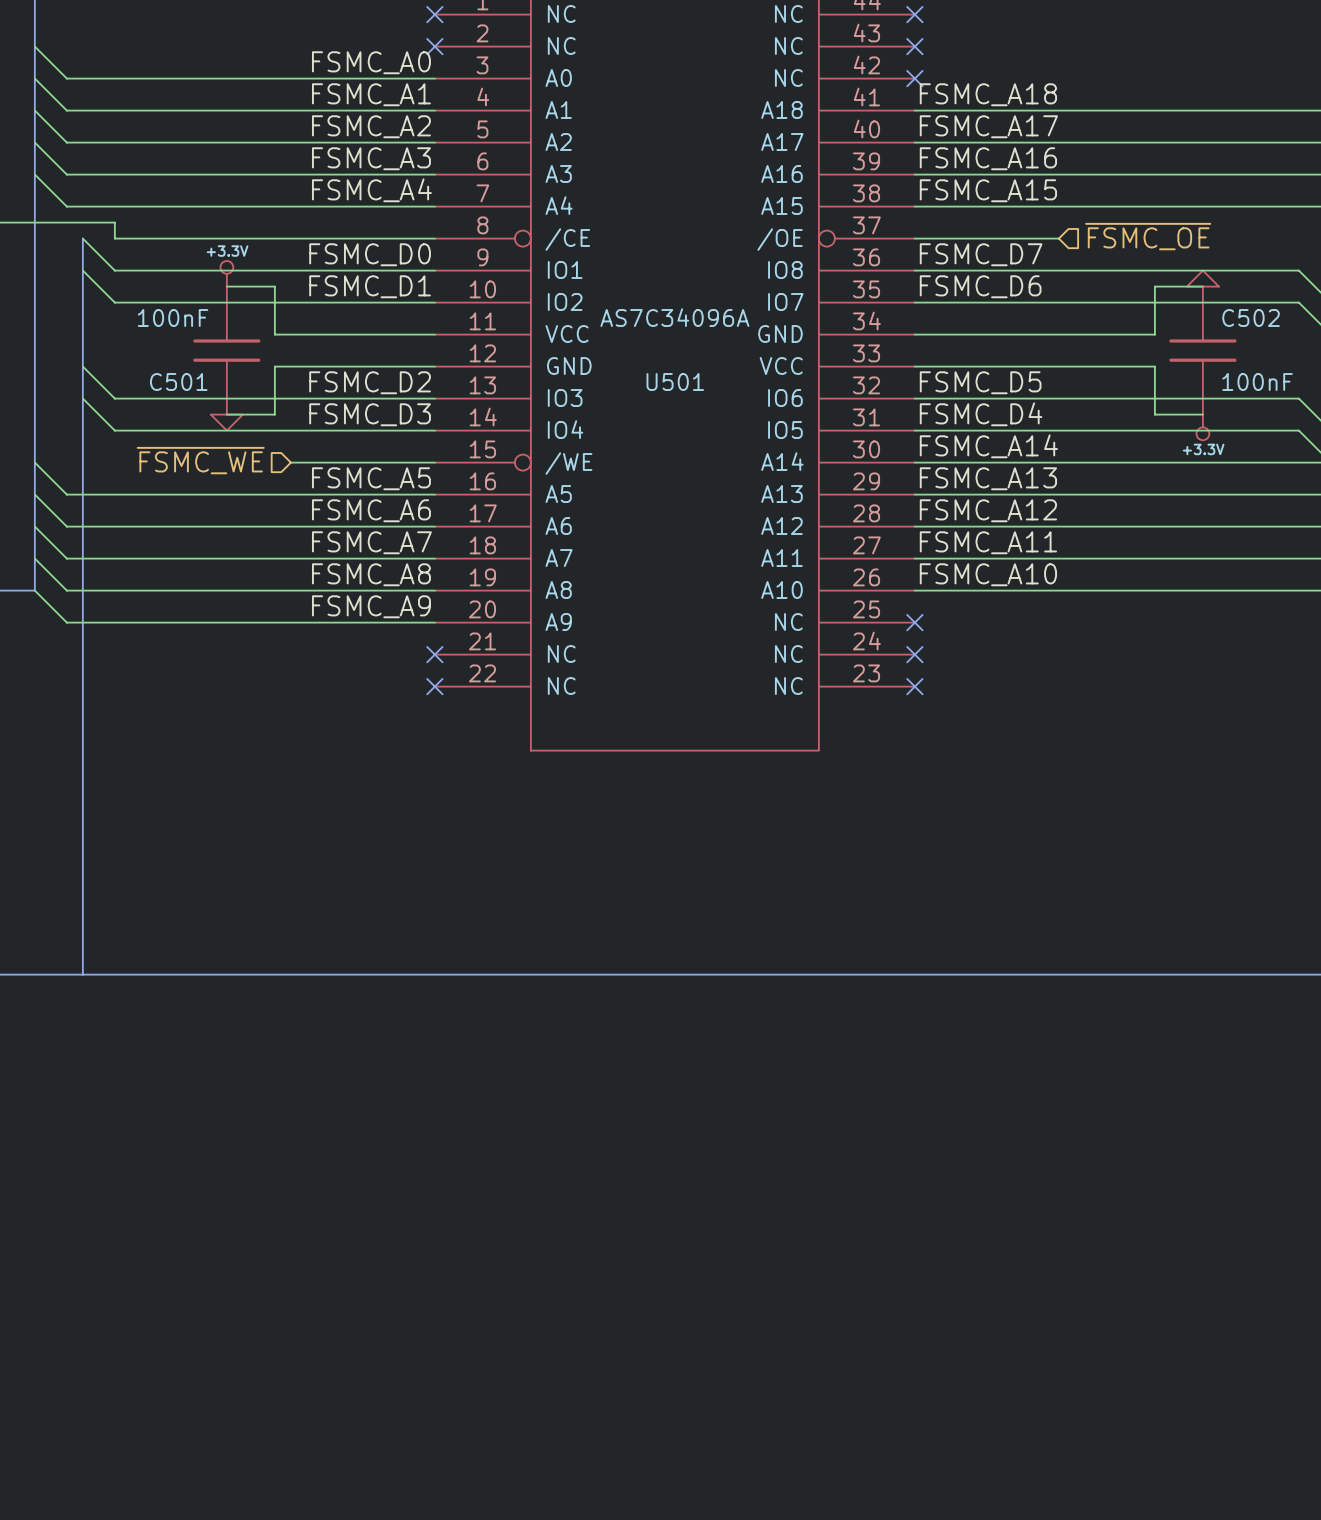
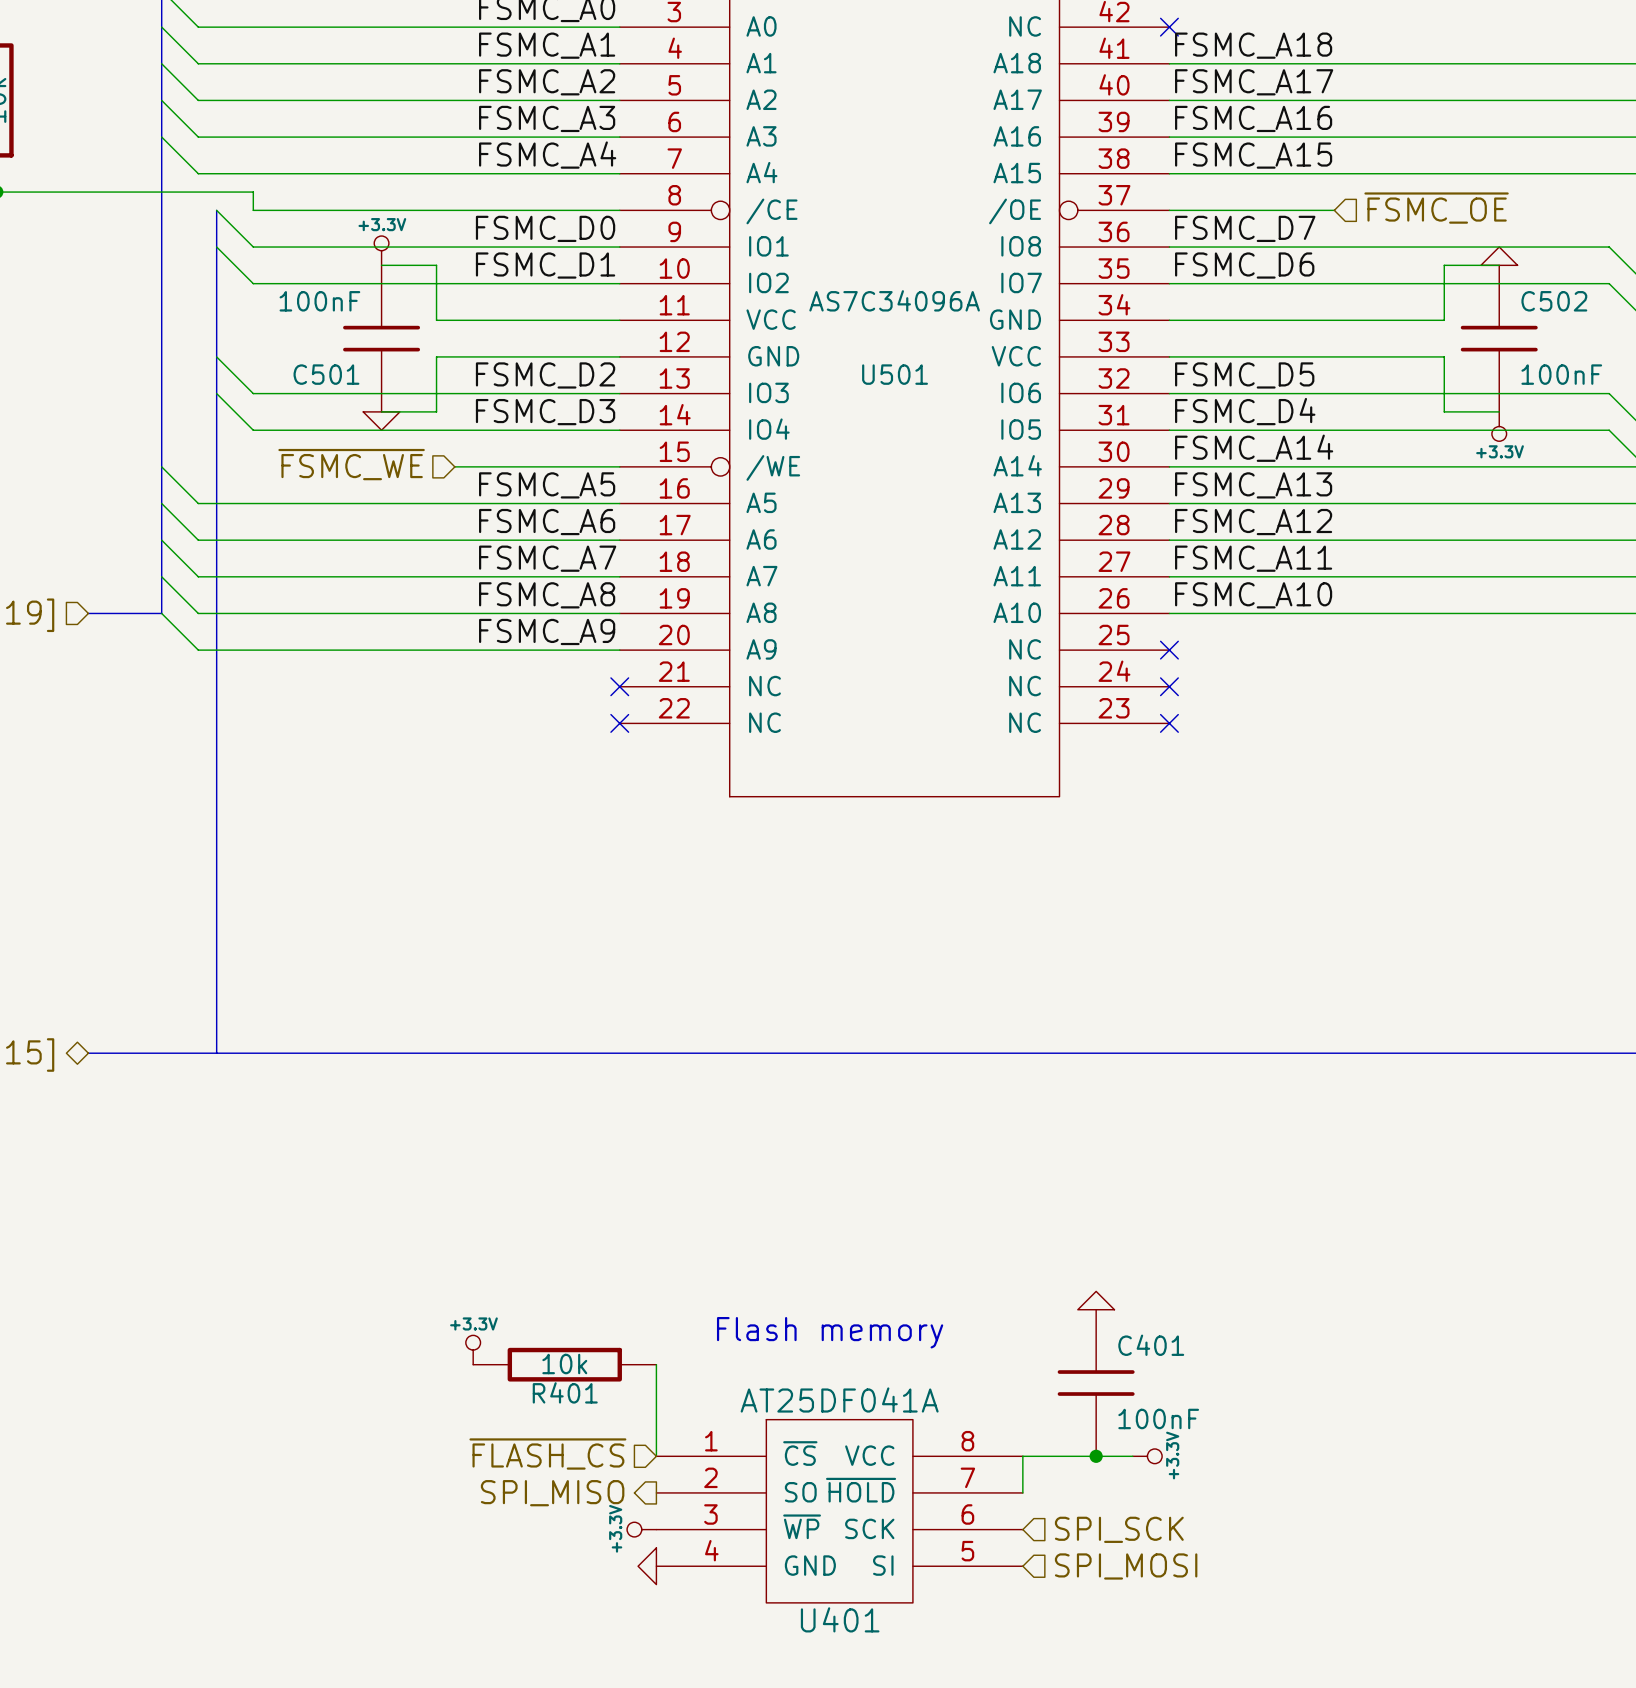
power symbol: none -> (1096, 1300)
text: none -> Flash memory (830, 1332)
power symbol: none -> +3.3V (473, 1350)
R401: none -> 10k (564, 1364)
wire: none -> (656, 1364) (656, 1456)
C401: none -> 100nF (1096, 1383)
hierarchical label: none -> ~{FLASH_CS} (547, 1454)
junction: none -> (1096, 1456)
wire: none -> (1132, 1456) (1022, 1456) (1022, 1492)
power symbol: none -> +3.3V (1147, 1456)
hierarchical label: none -> SPI_MISO (552, 1493)
U401: none -> AT25DF041A (839, 1511)
power symbol: none -> +3.3V (641, 1529)
hierarchical label: none -> SPI_SCK (1119, 1529)
power symbol: none -> (647, 1566)
hierarchical label: none -> SPI_MOSI (1126, 1566)

